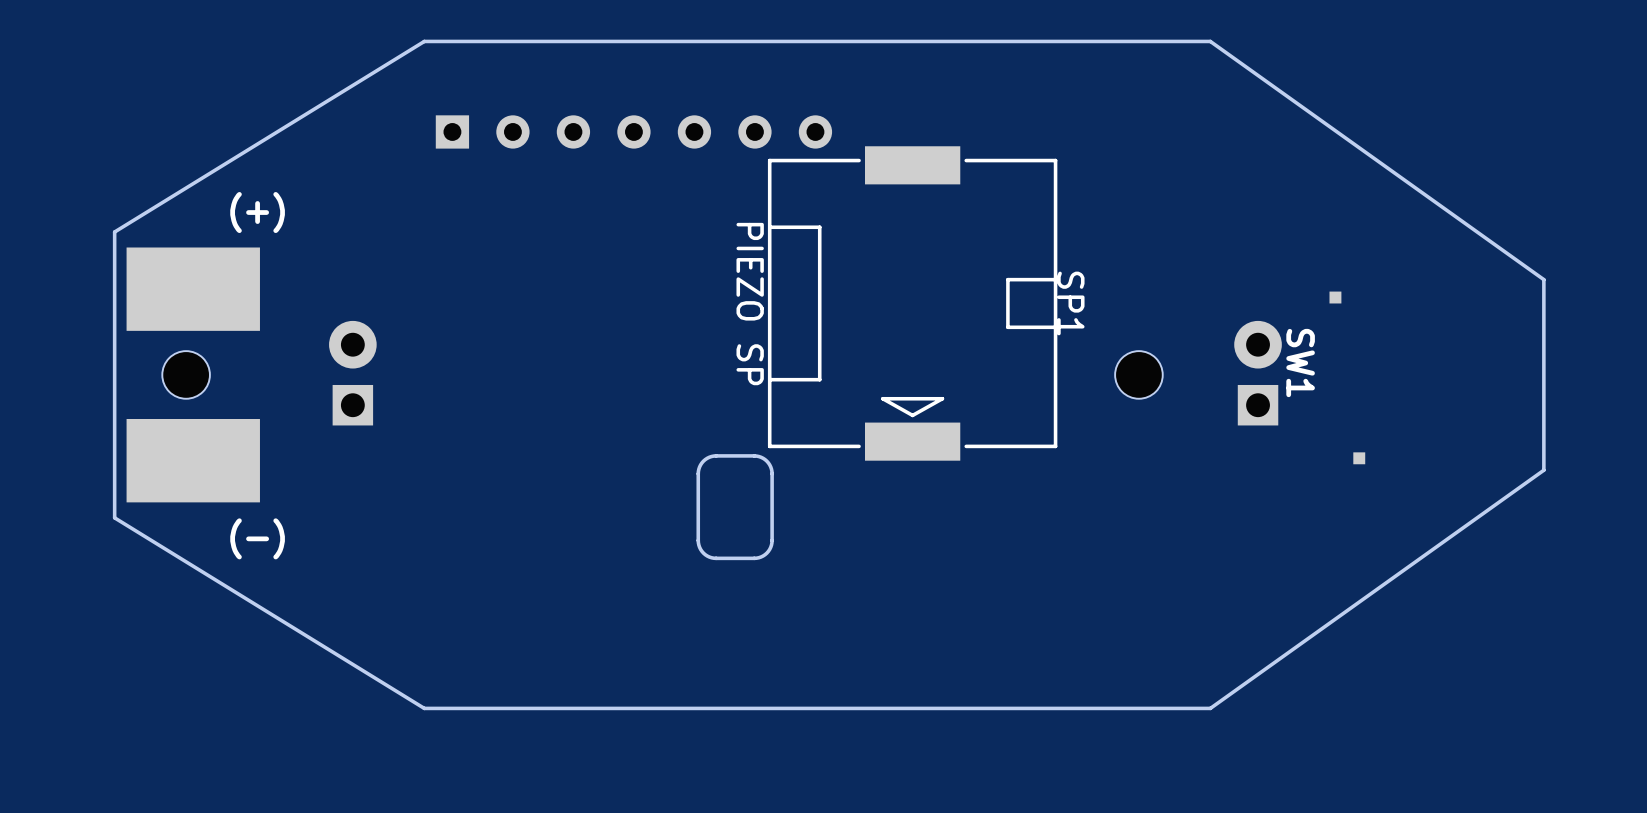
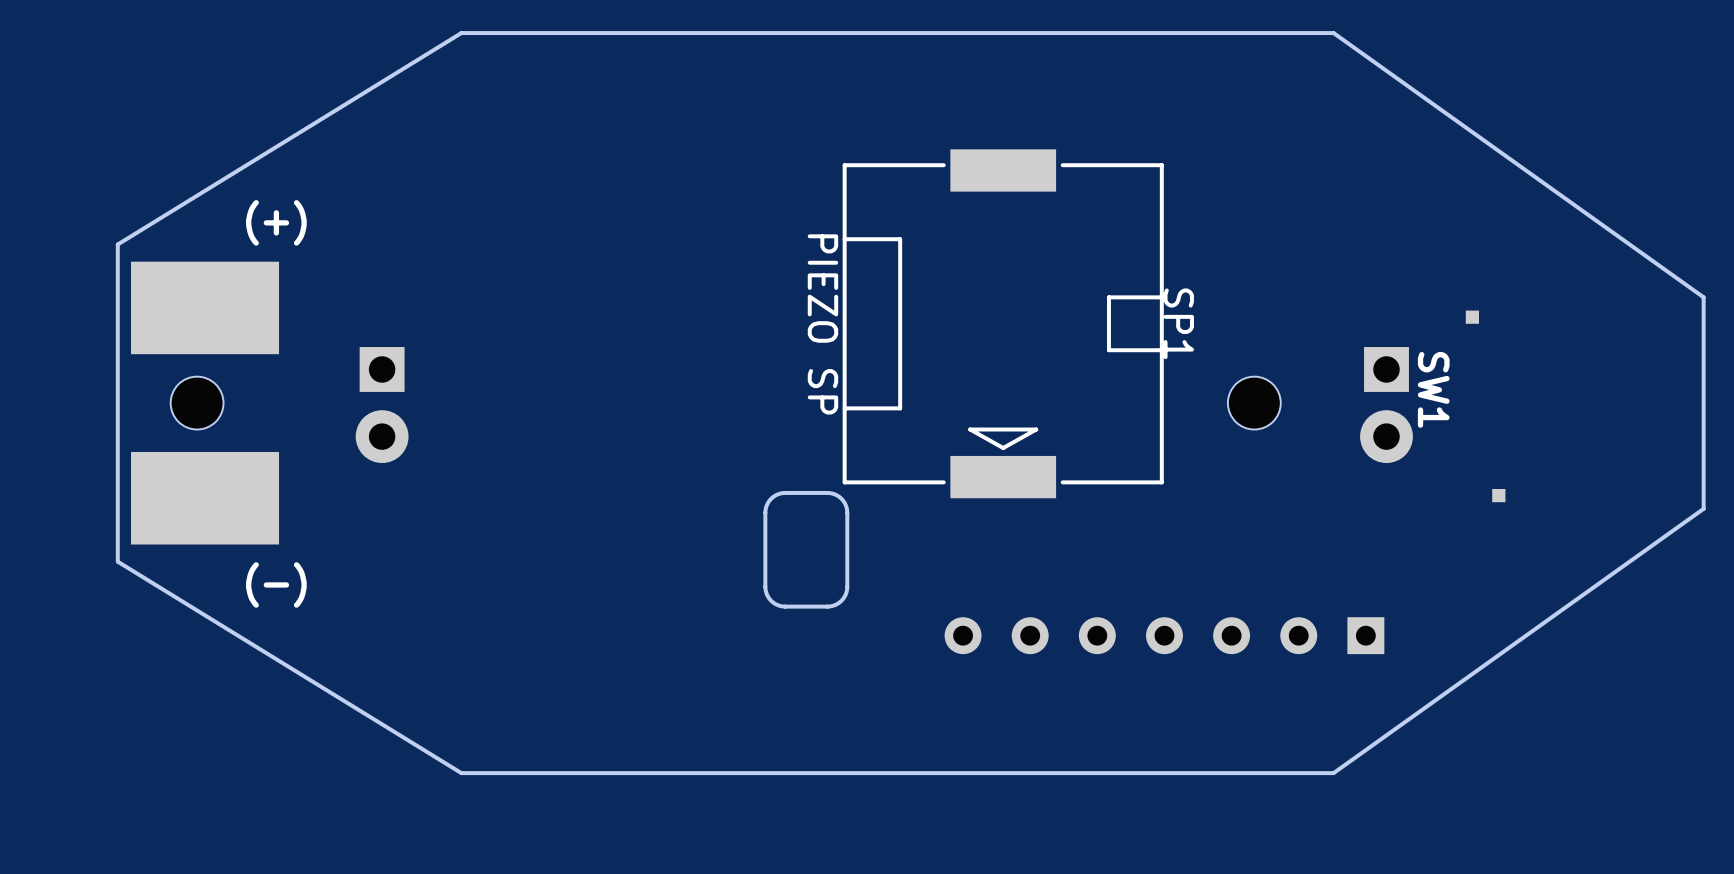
part: (633, 131) -> none
part rotation: 0° (352, 373) -> 180° (382, 405)
part rotation: 0° (1258, 373) -> 180° (1386, 405)
part: none -> (1164, 635)

